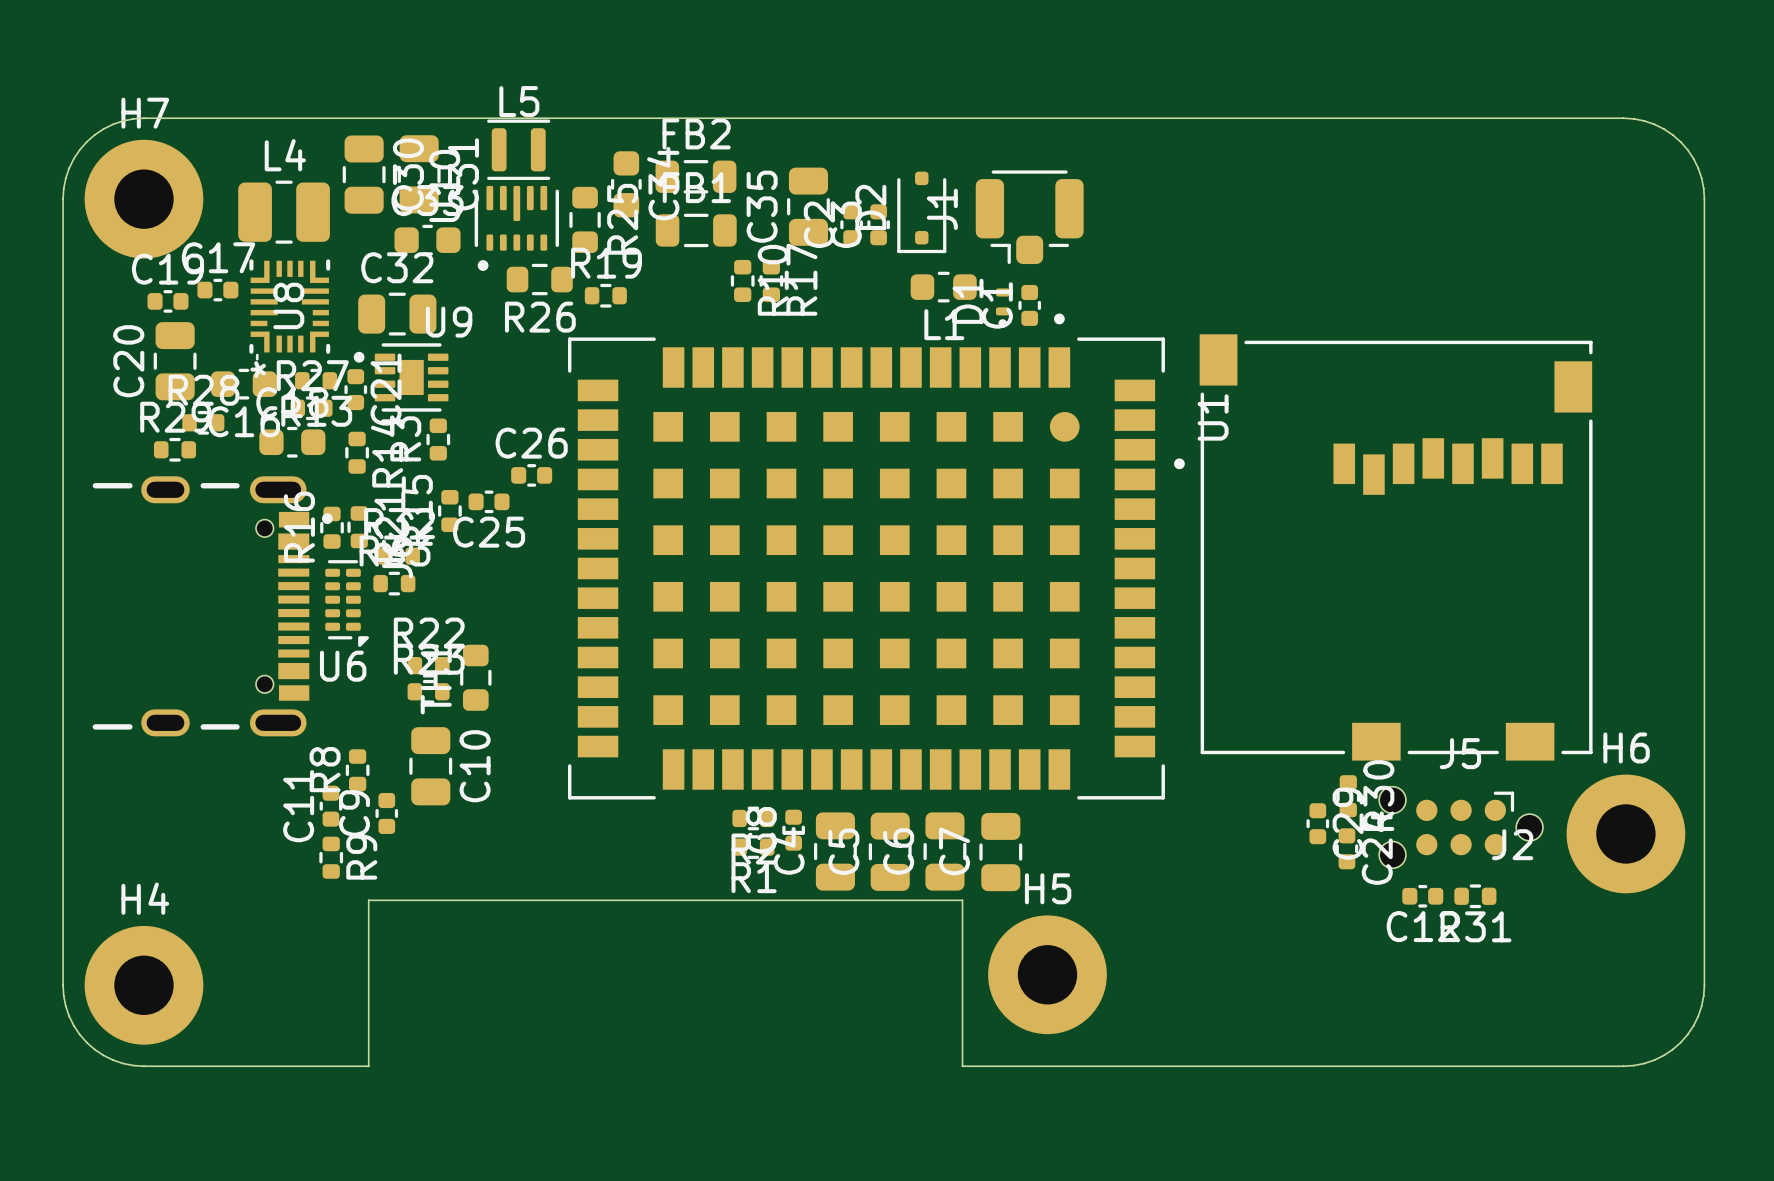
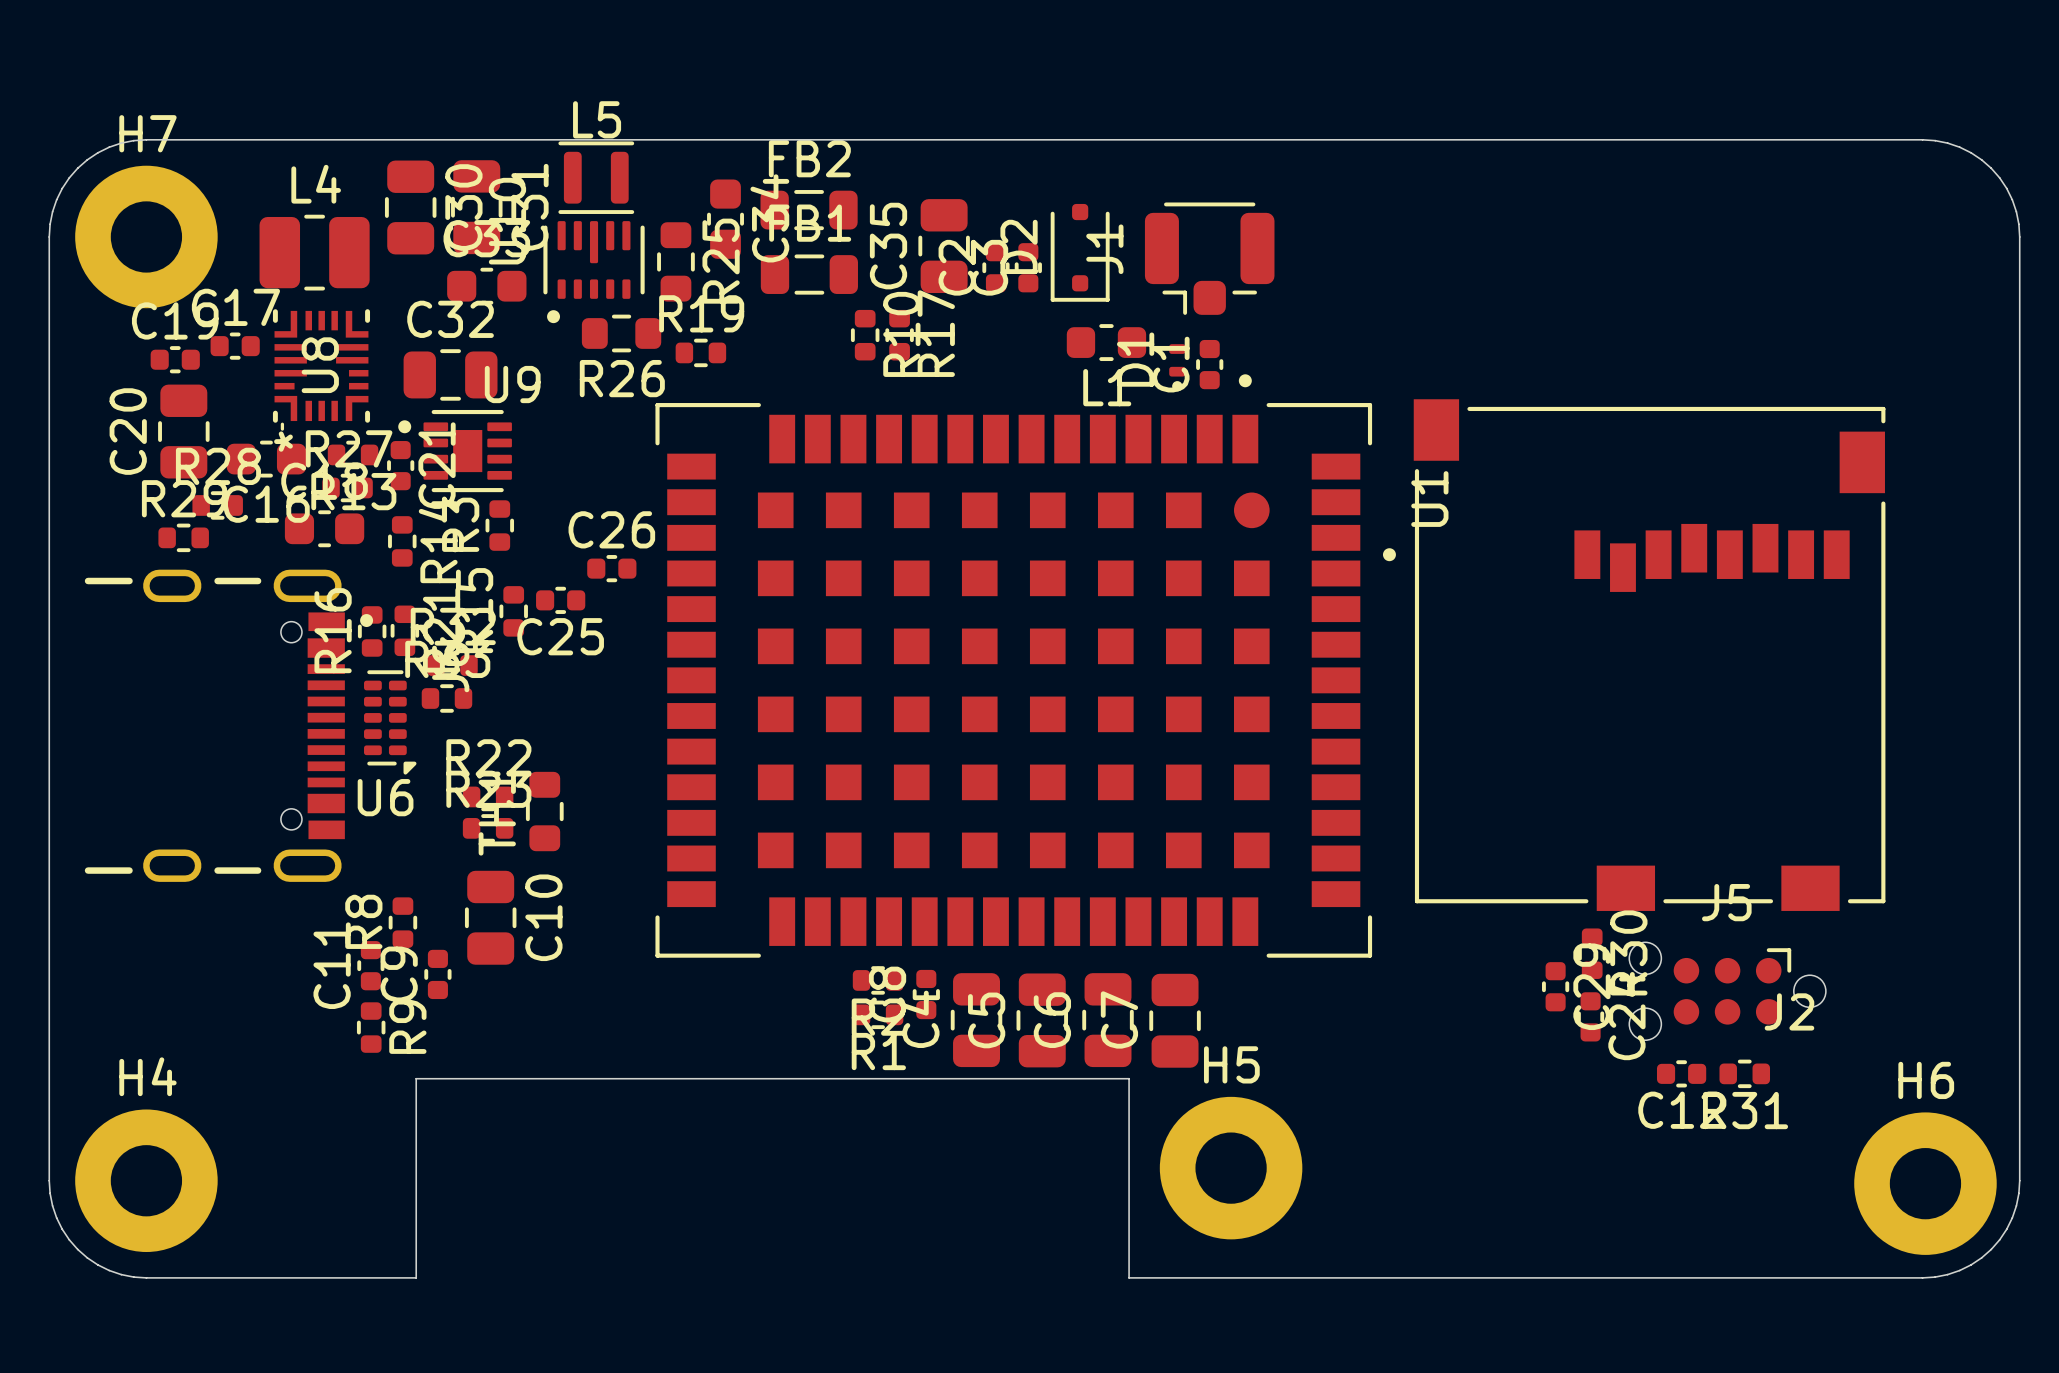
H6 position: (1625, 833) -> (1925, 1183)

